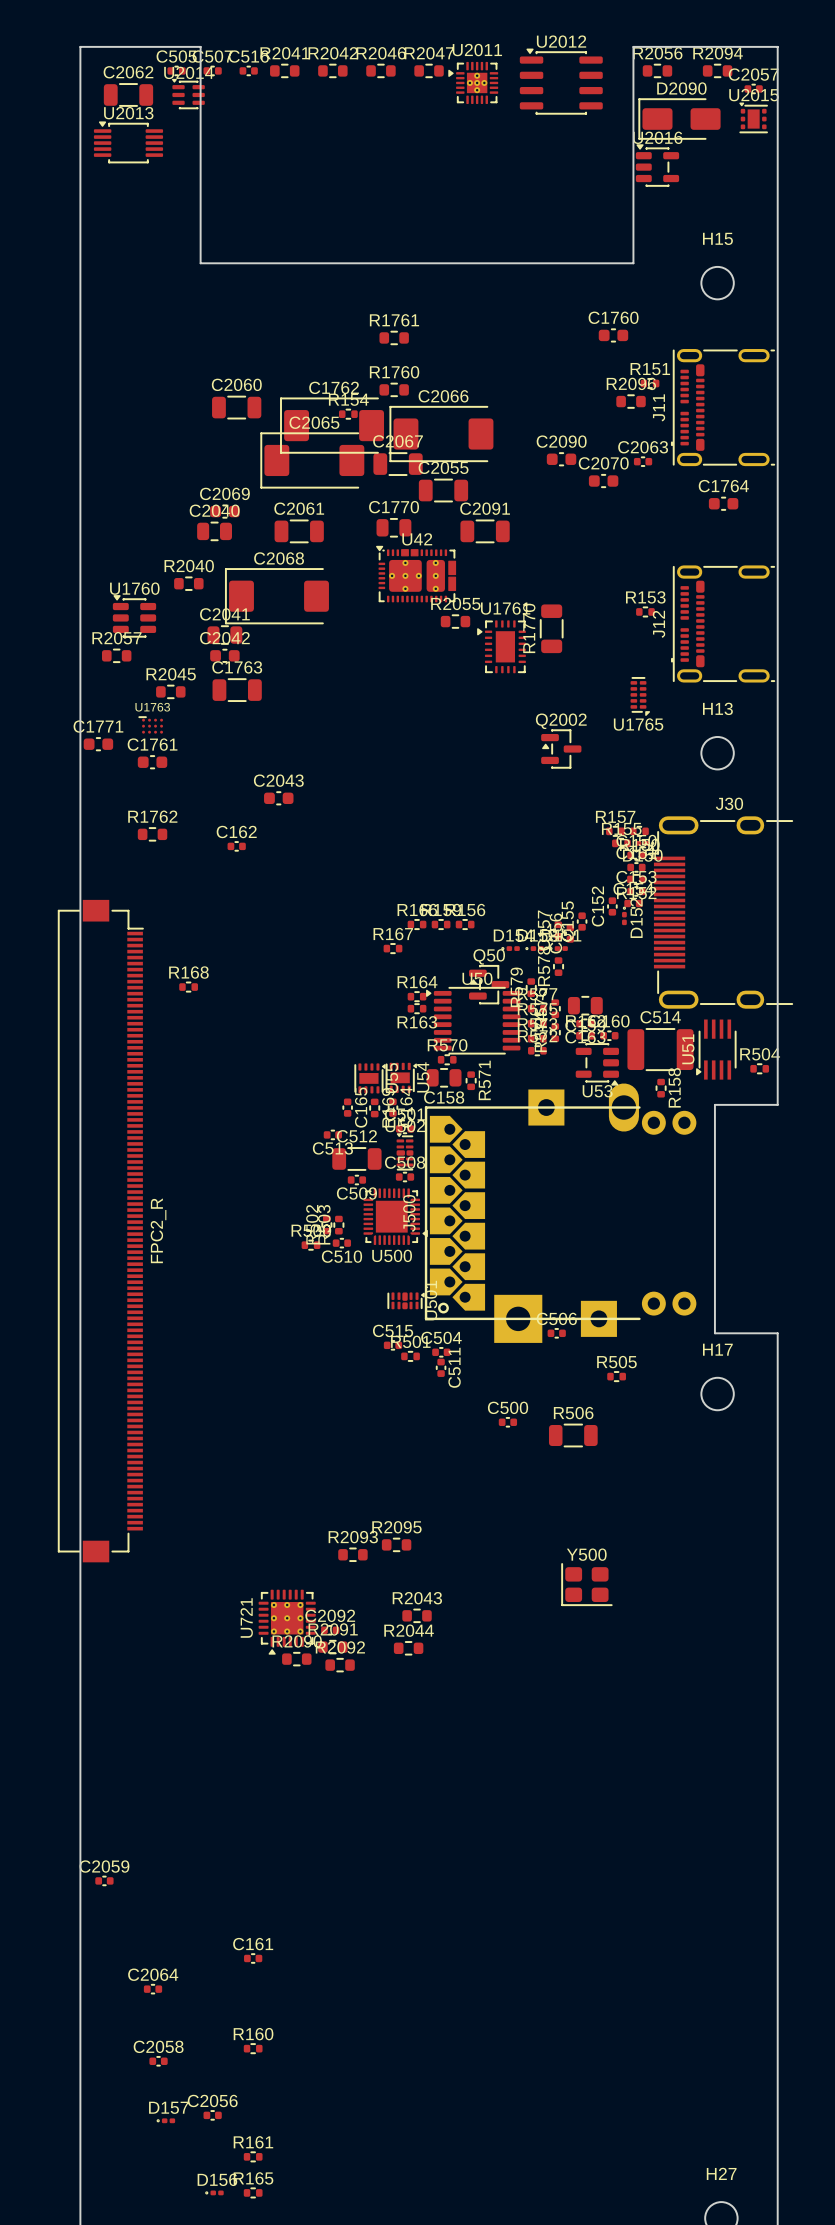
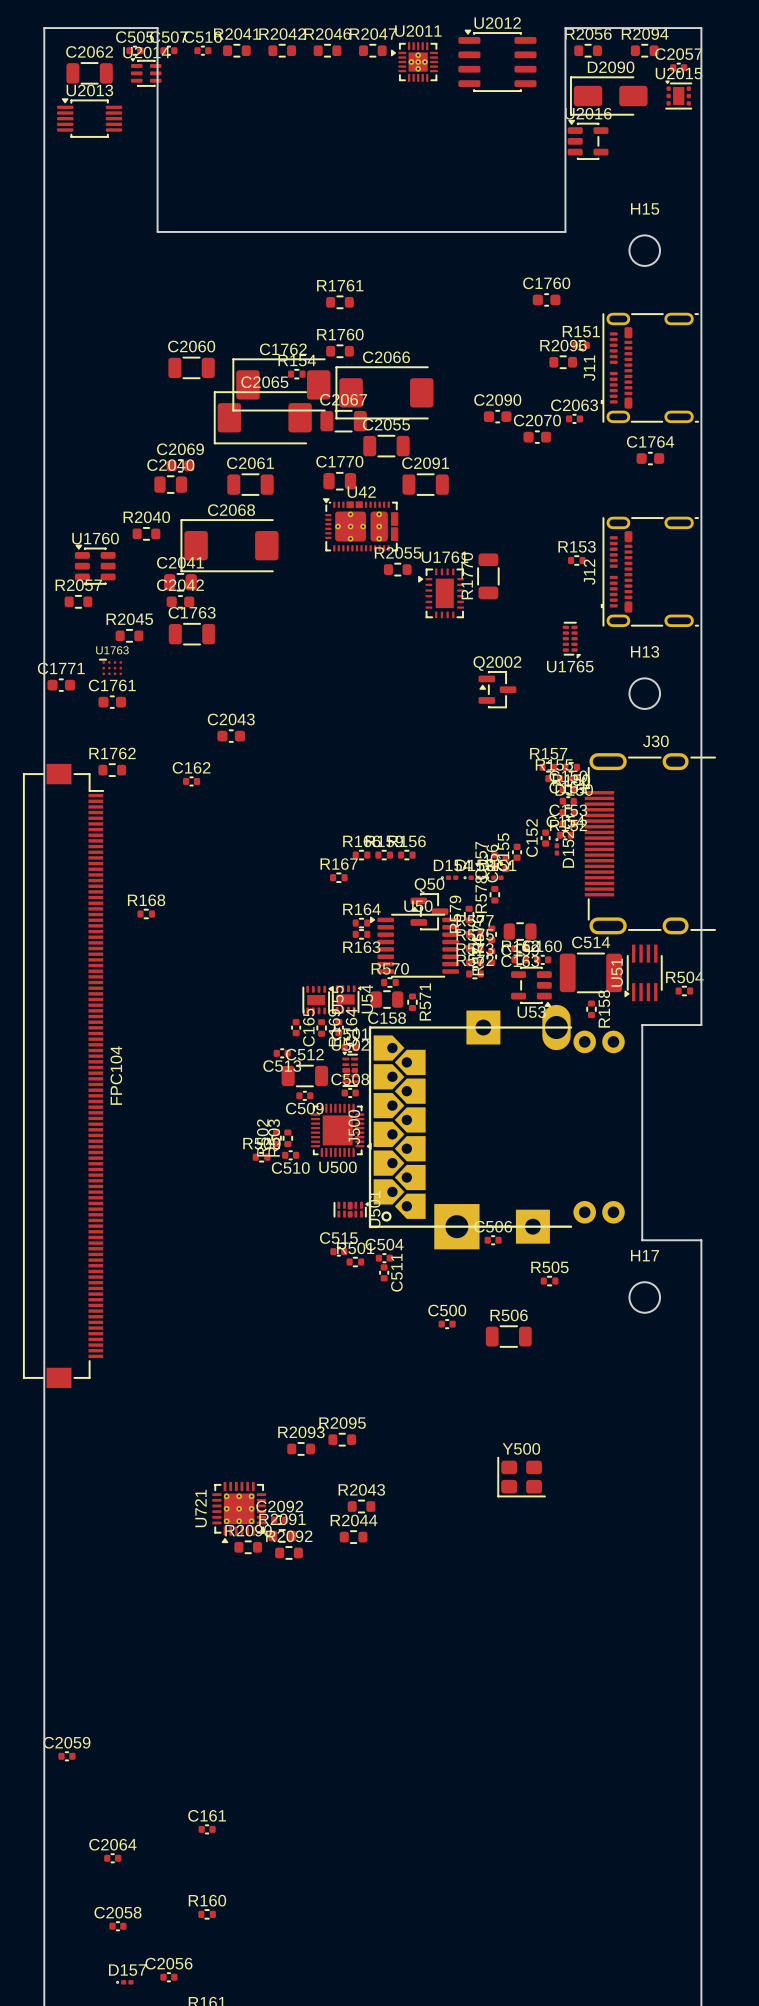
FPC104: none -> (63, 1076)
FPC2_R: (100, 1231) -> none

